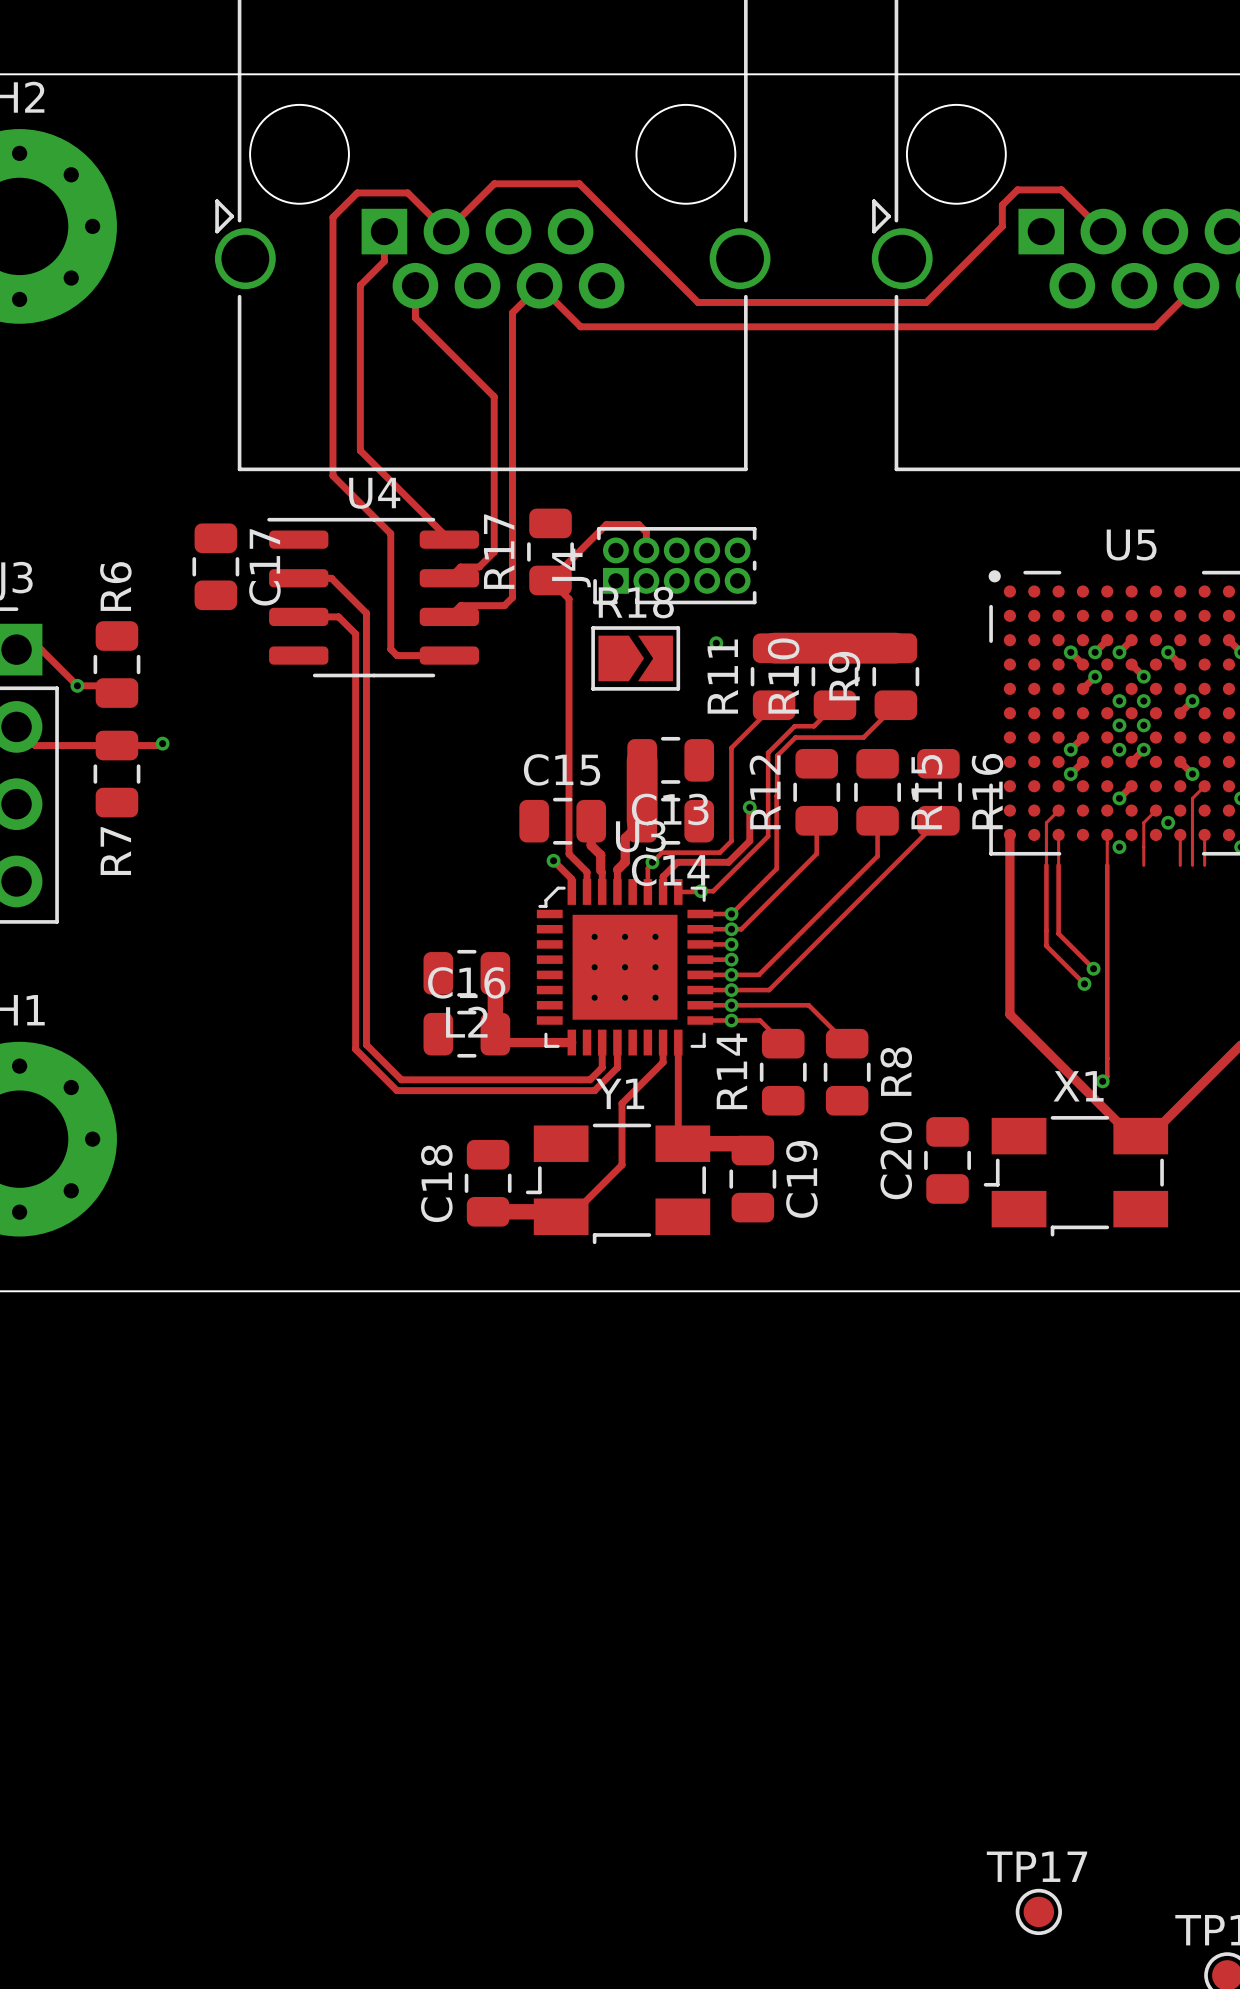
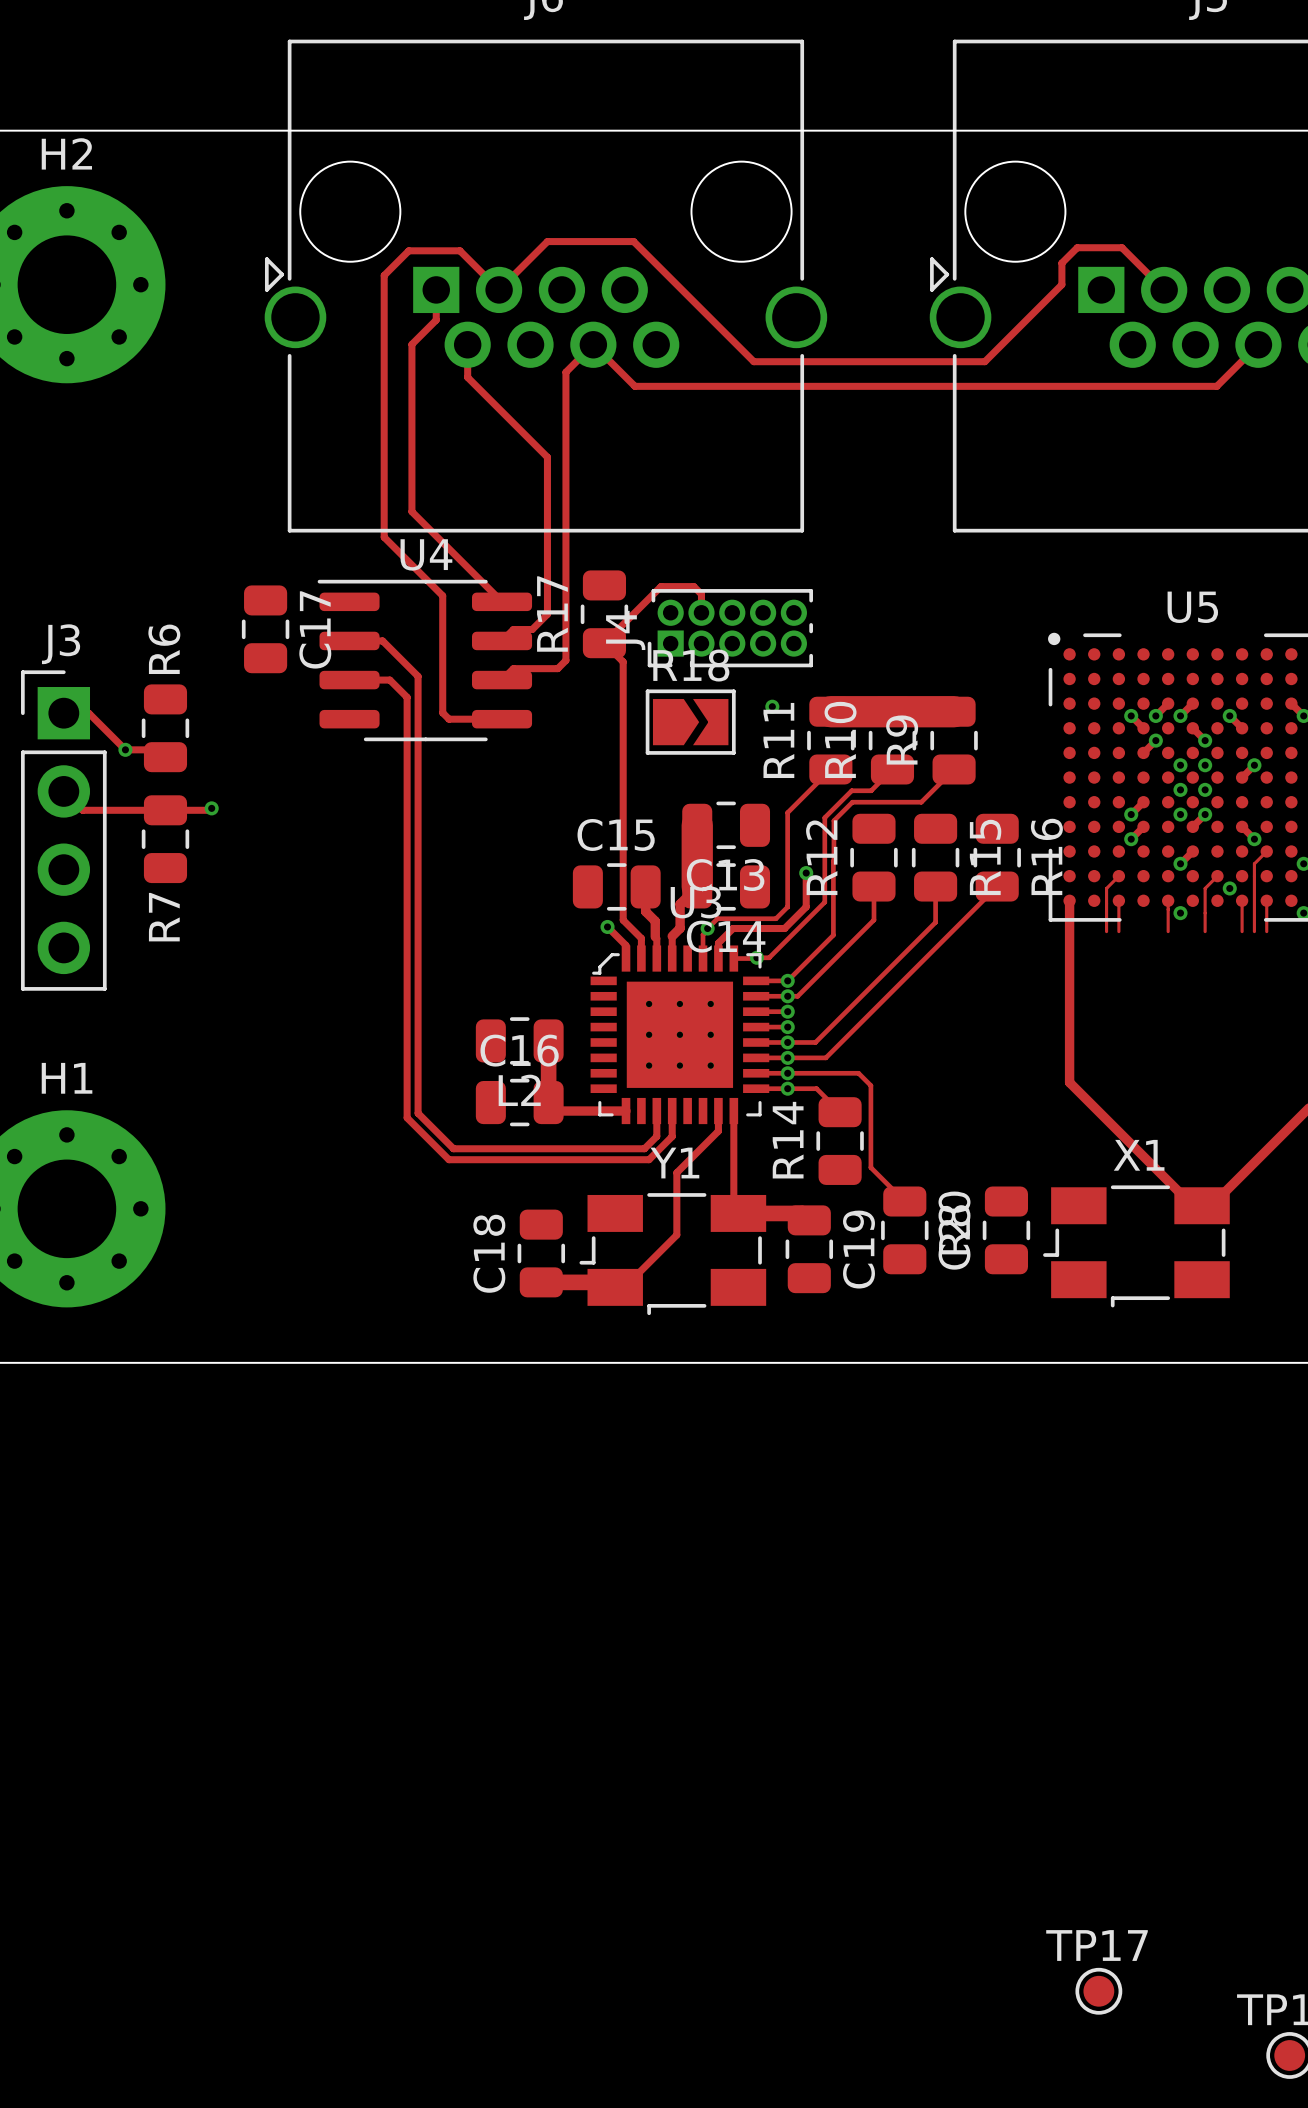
track: (1046, 865) (1046, 945) (1084, 983) -> none
track: (1058, 865) (1058, 933) (1093, 968) -> none
track: (1107, 865) (1107, 1076) (1102, 1081) -> none
via: (1093, 968) -> none
via: (1084, 983) -> none
track: (801, 1005) (808, 1005) (847, 1043) -> (858, 1073) (870, 1085) (870, 1167) (904, 1201)
R8 position: (847, 1072) -> (904, 1230)
via: (1102, 1081) -> none

